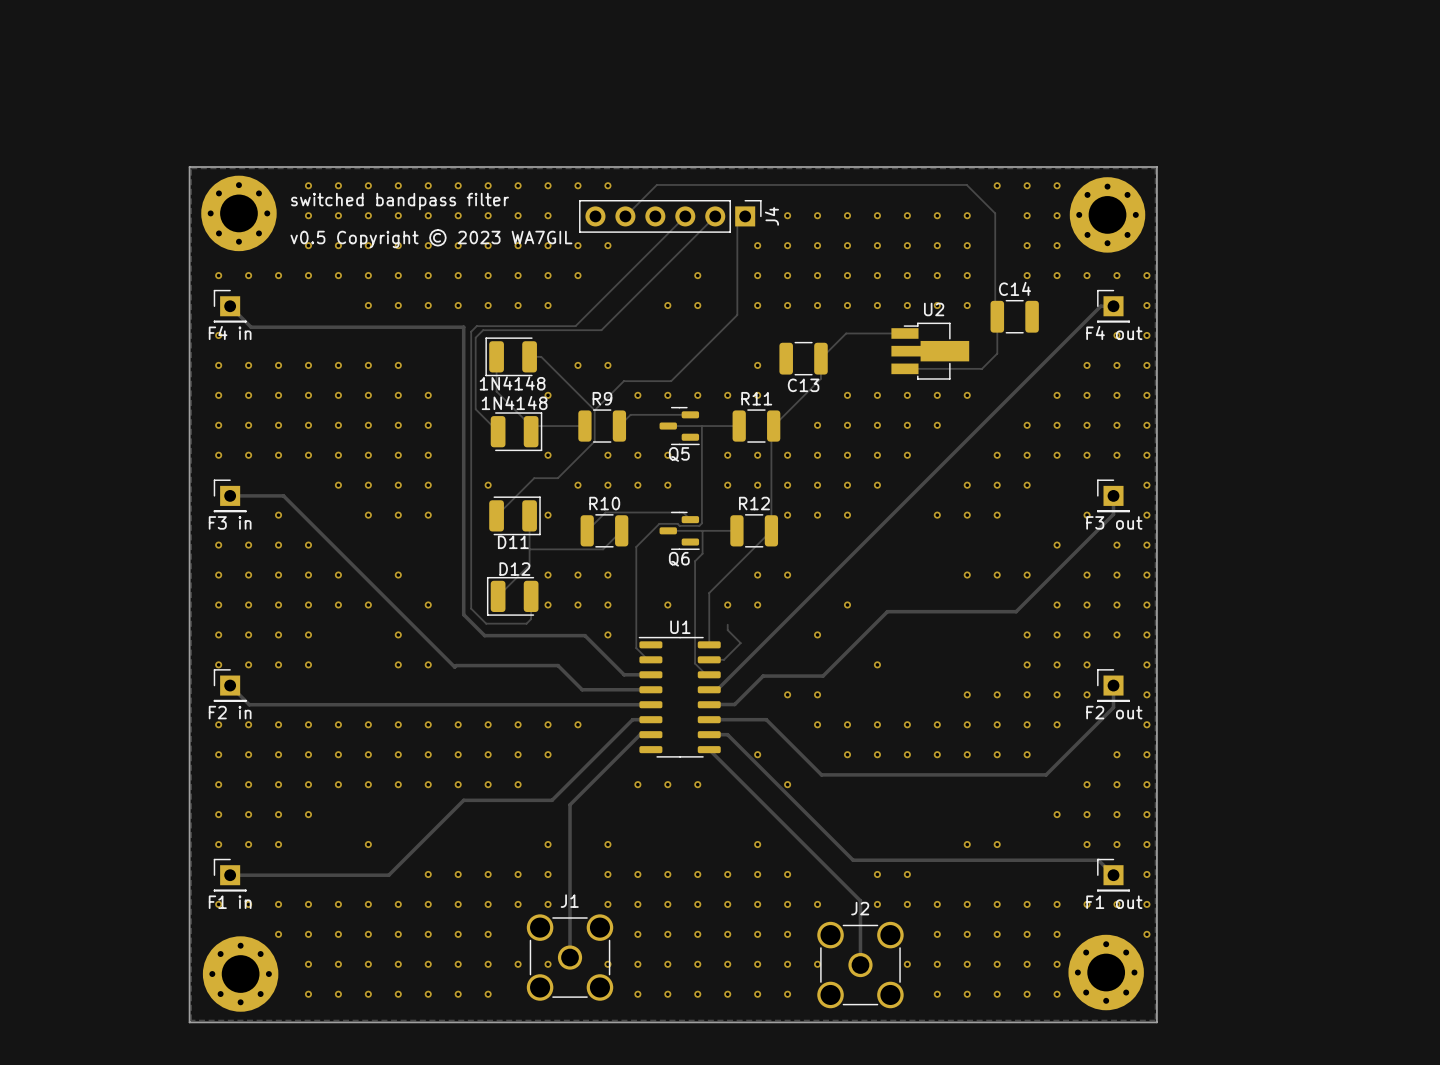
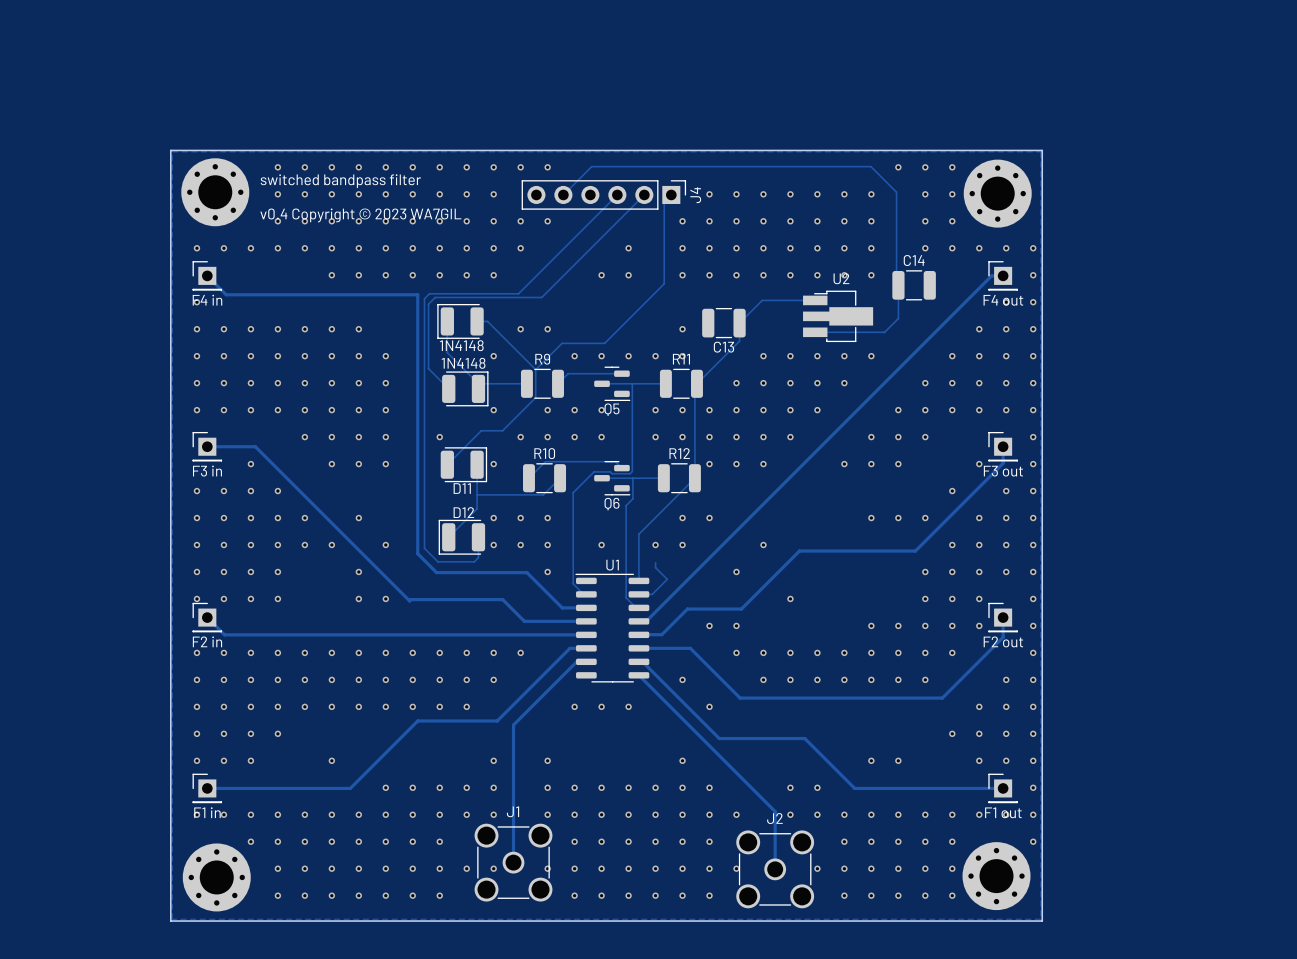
text: v0.5 Copyright © 2023 WA7GIL (431, 238) -> v0.4 Copyright © 2023 WA7GIL (360, 215)
track: (713, 734) (727, 734) (853, 860) (1098, 860) (1113, 875) -> (642, 661) (719, 738) (804, 738) (854, 788) (1003, 788)

